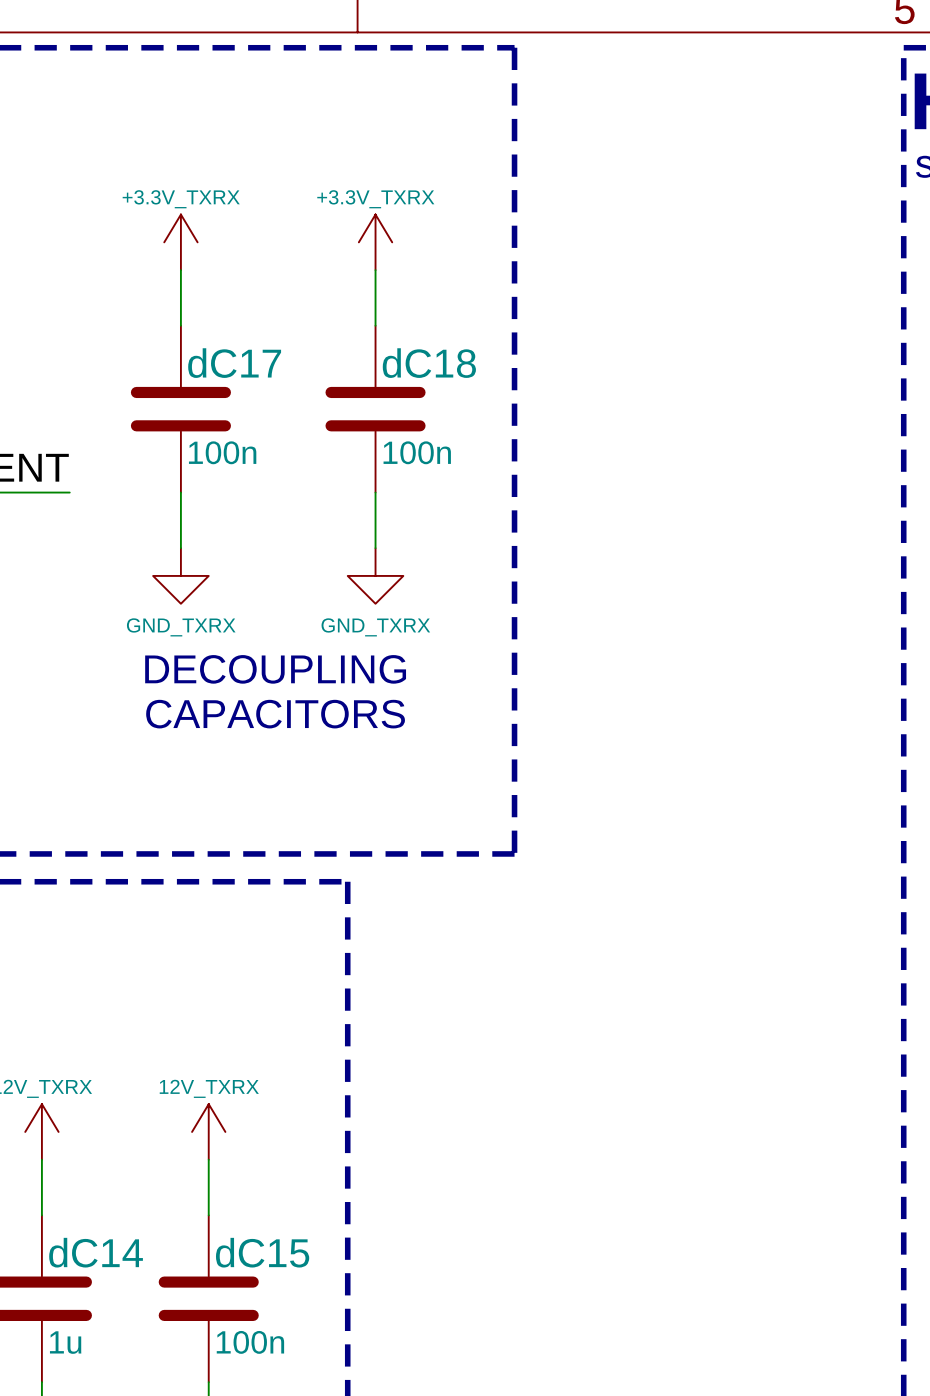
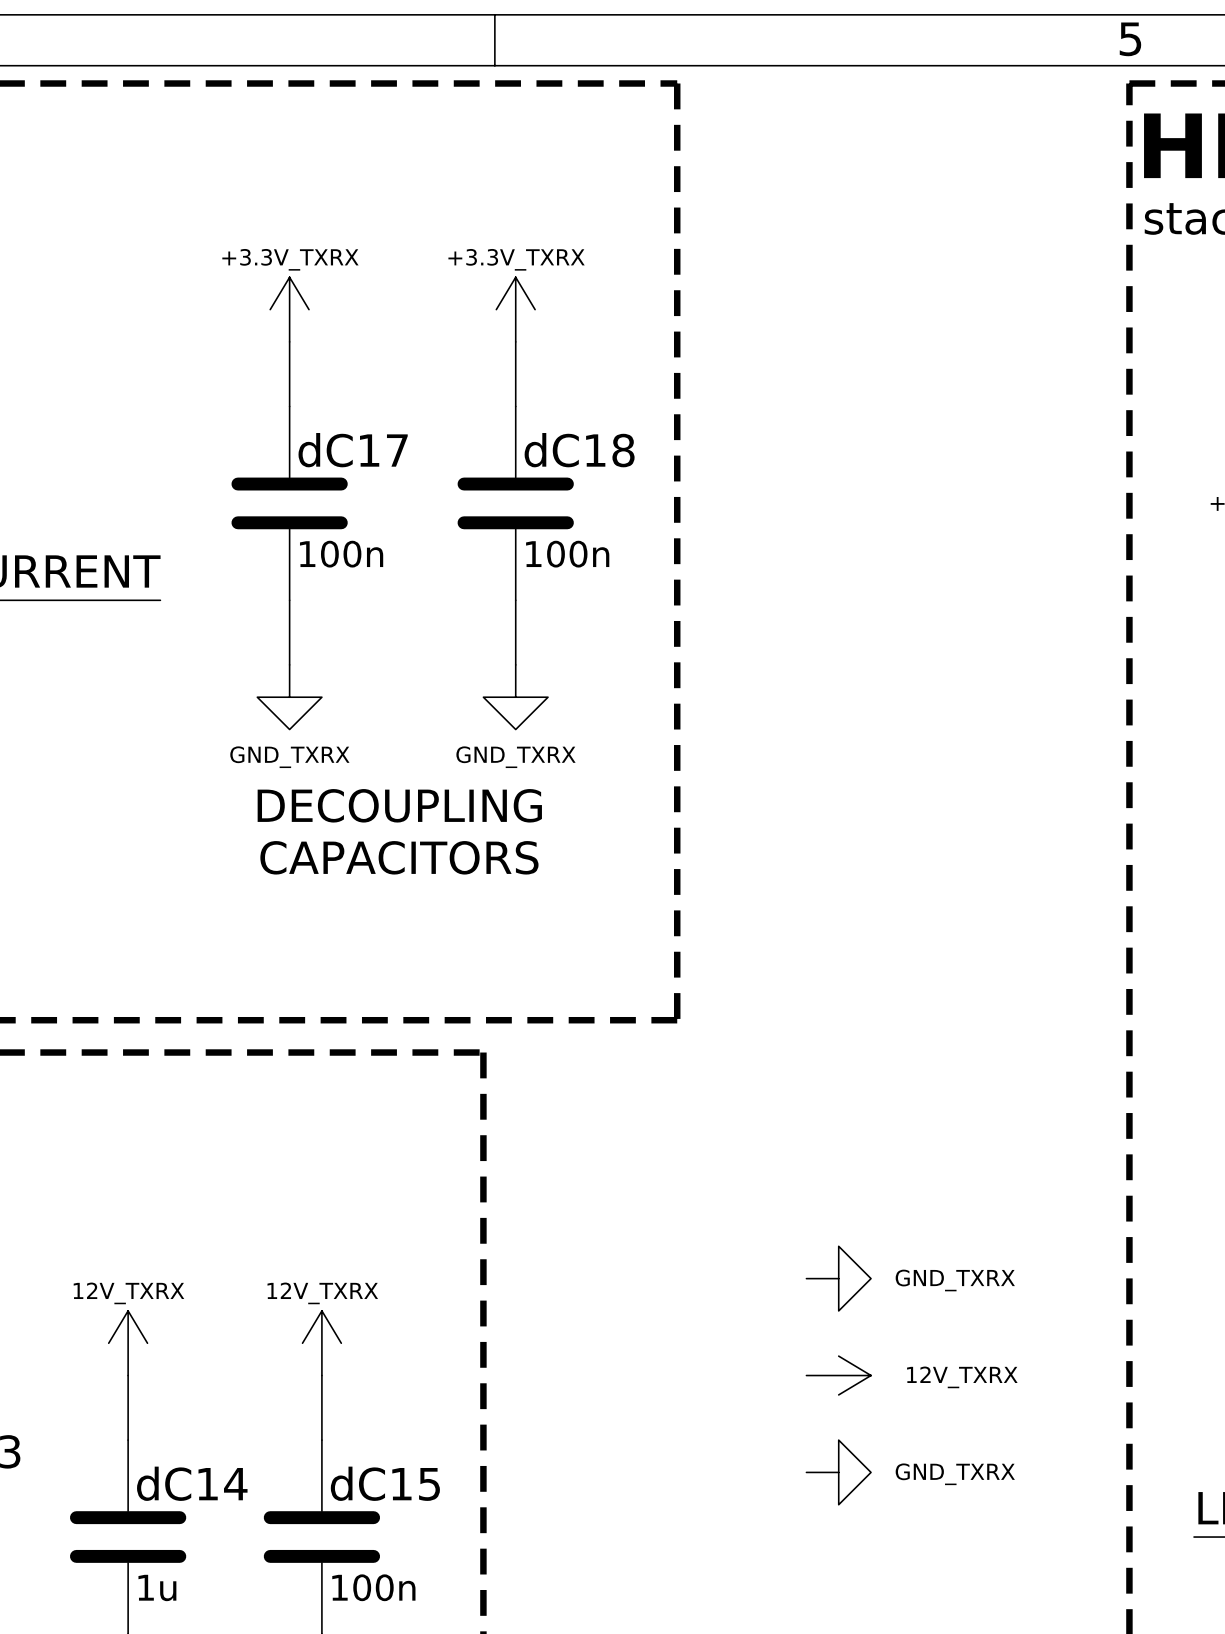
power symbol: none -> GND_TXRX (838, 1278)
power symbol: none -> 12V_TXRX (838, 1375)
power symbol: none -> GND_TXRX (838, 1472)

